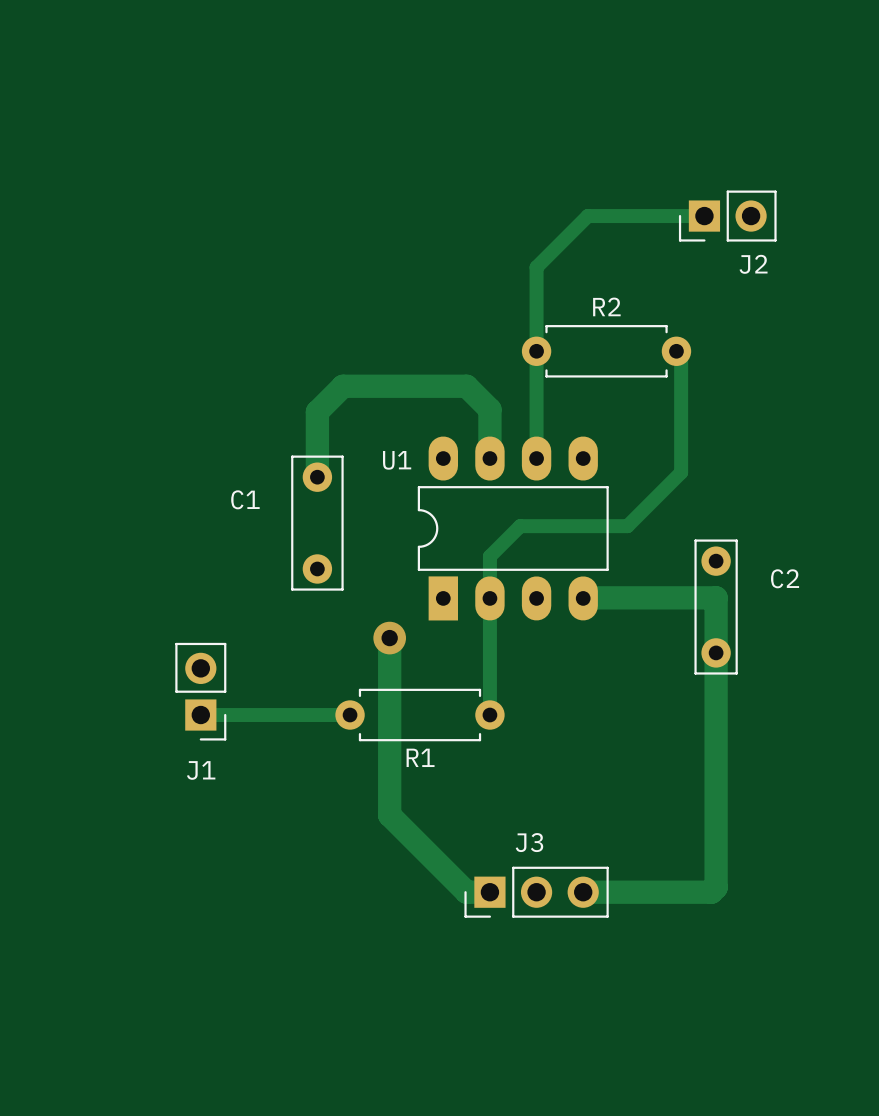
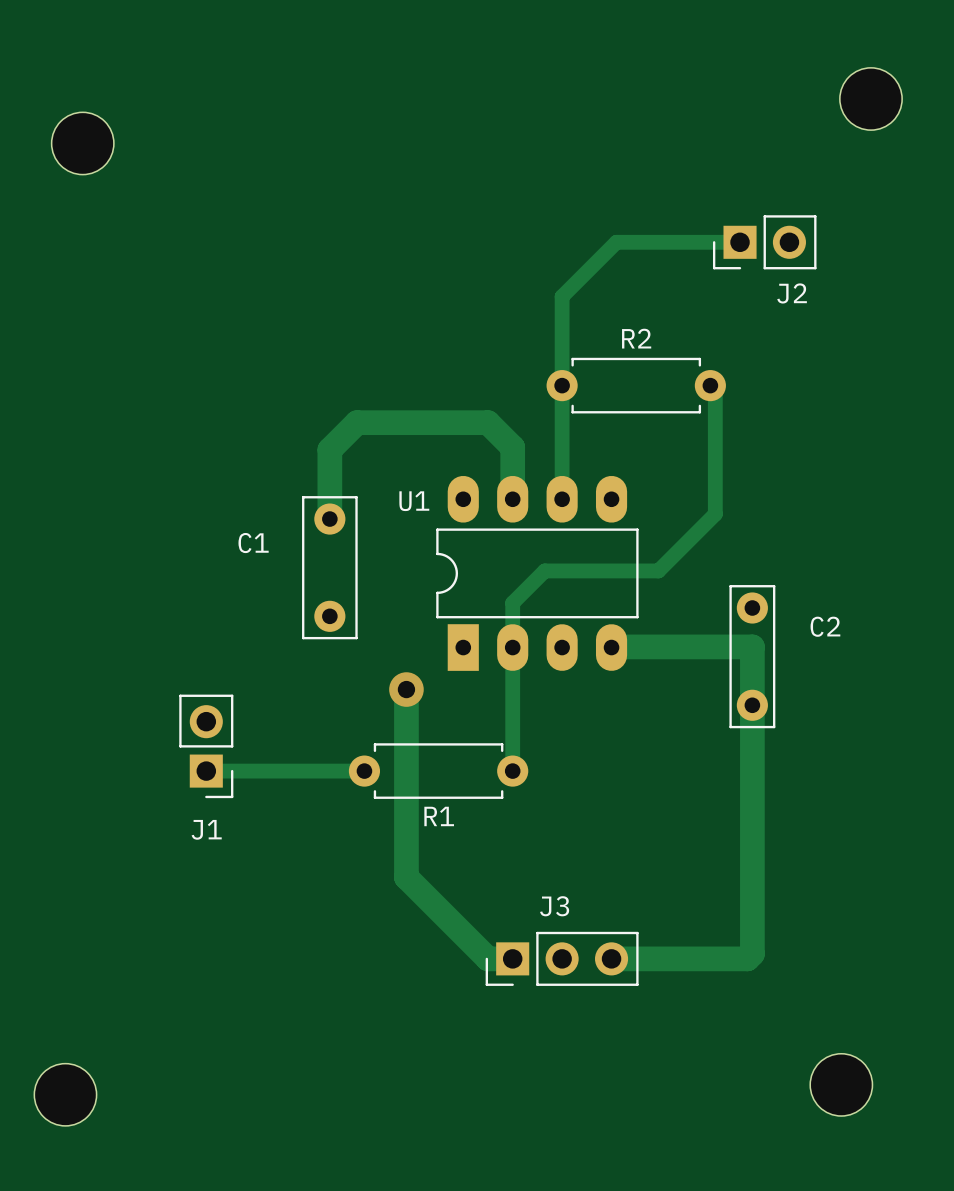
part: none -> (870, 98)
part: none -> (82, 143)
part: none -> (841, 1084)
part: none -> (65, 1094)

